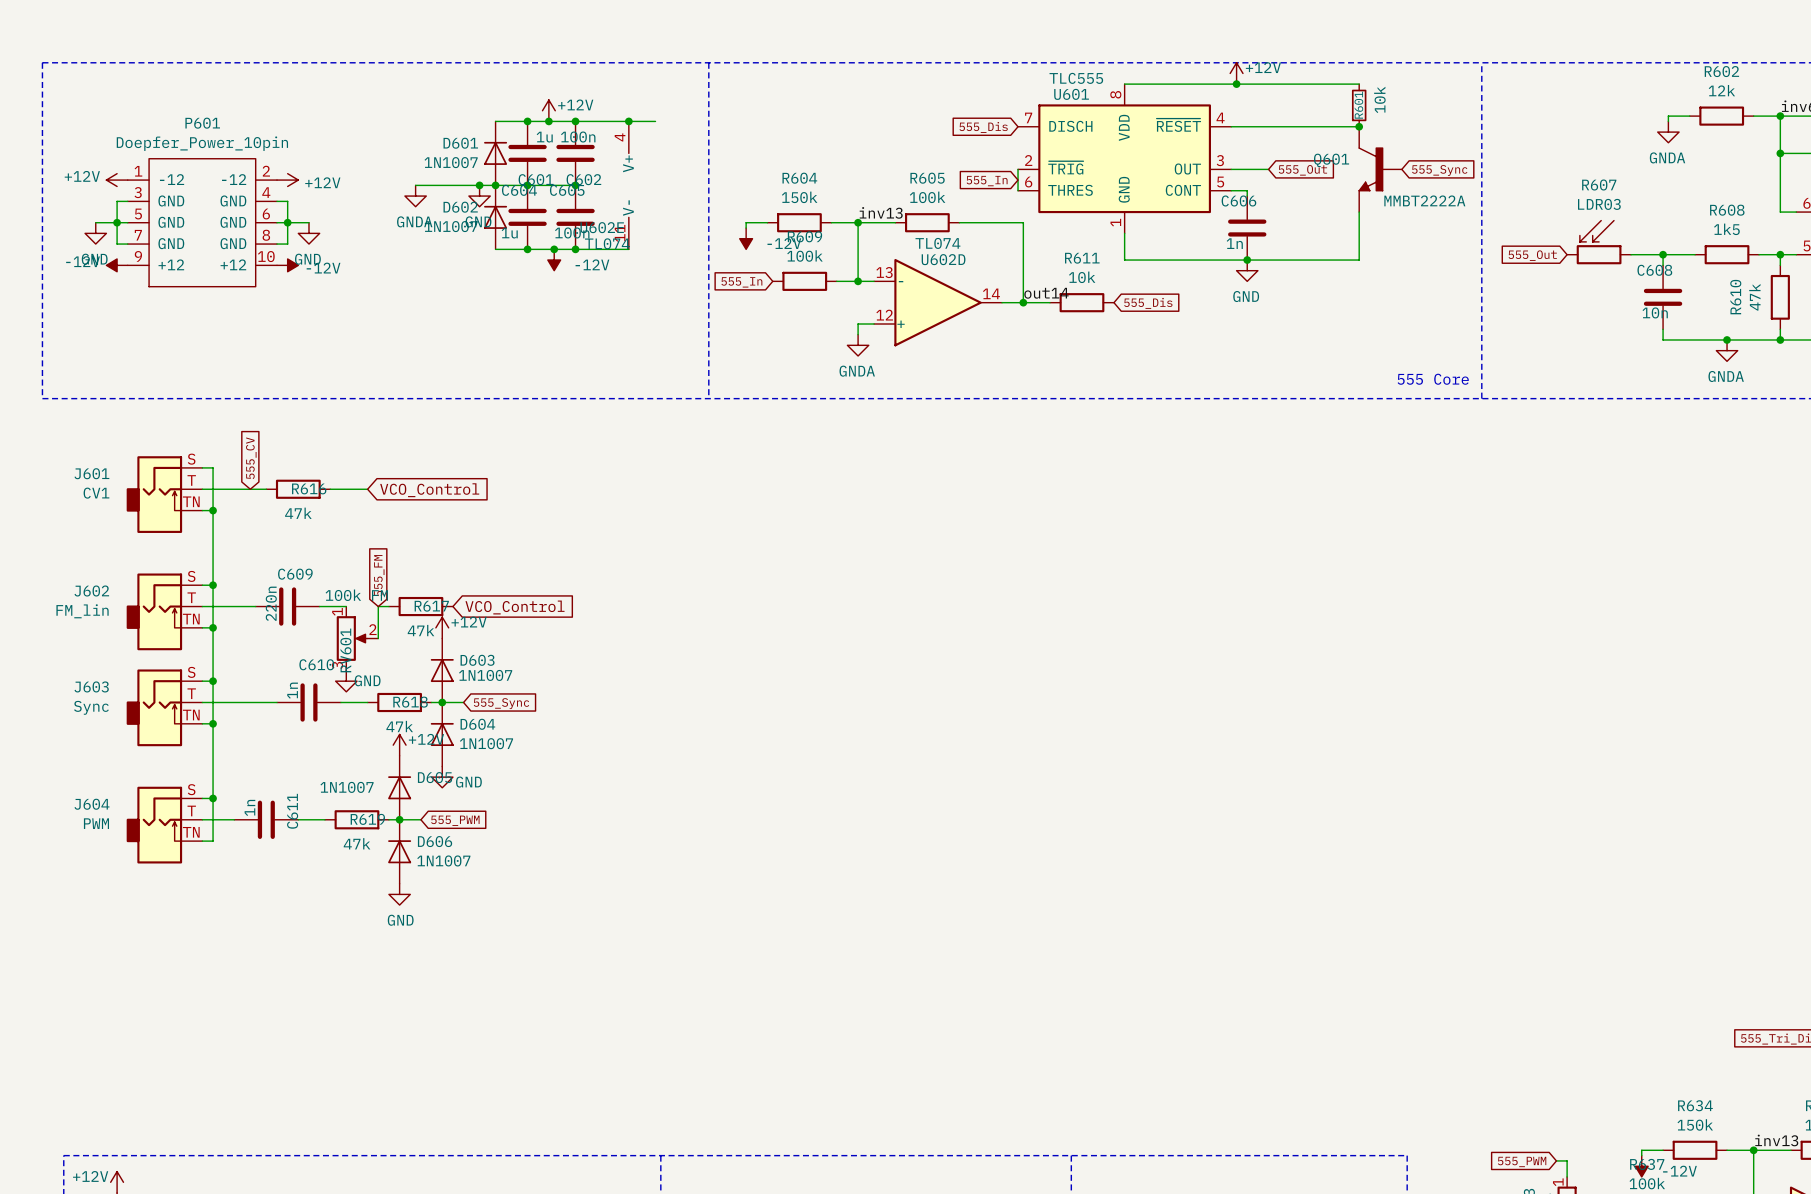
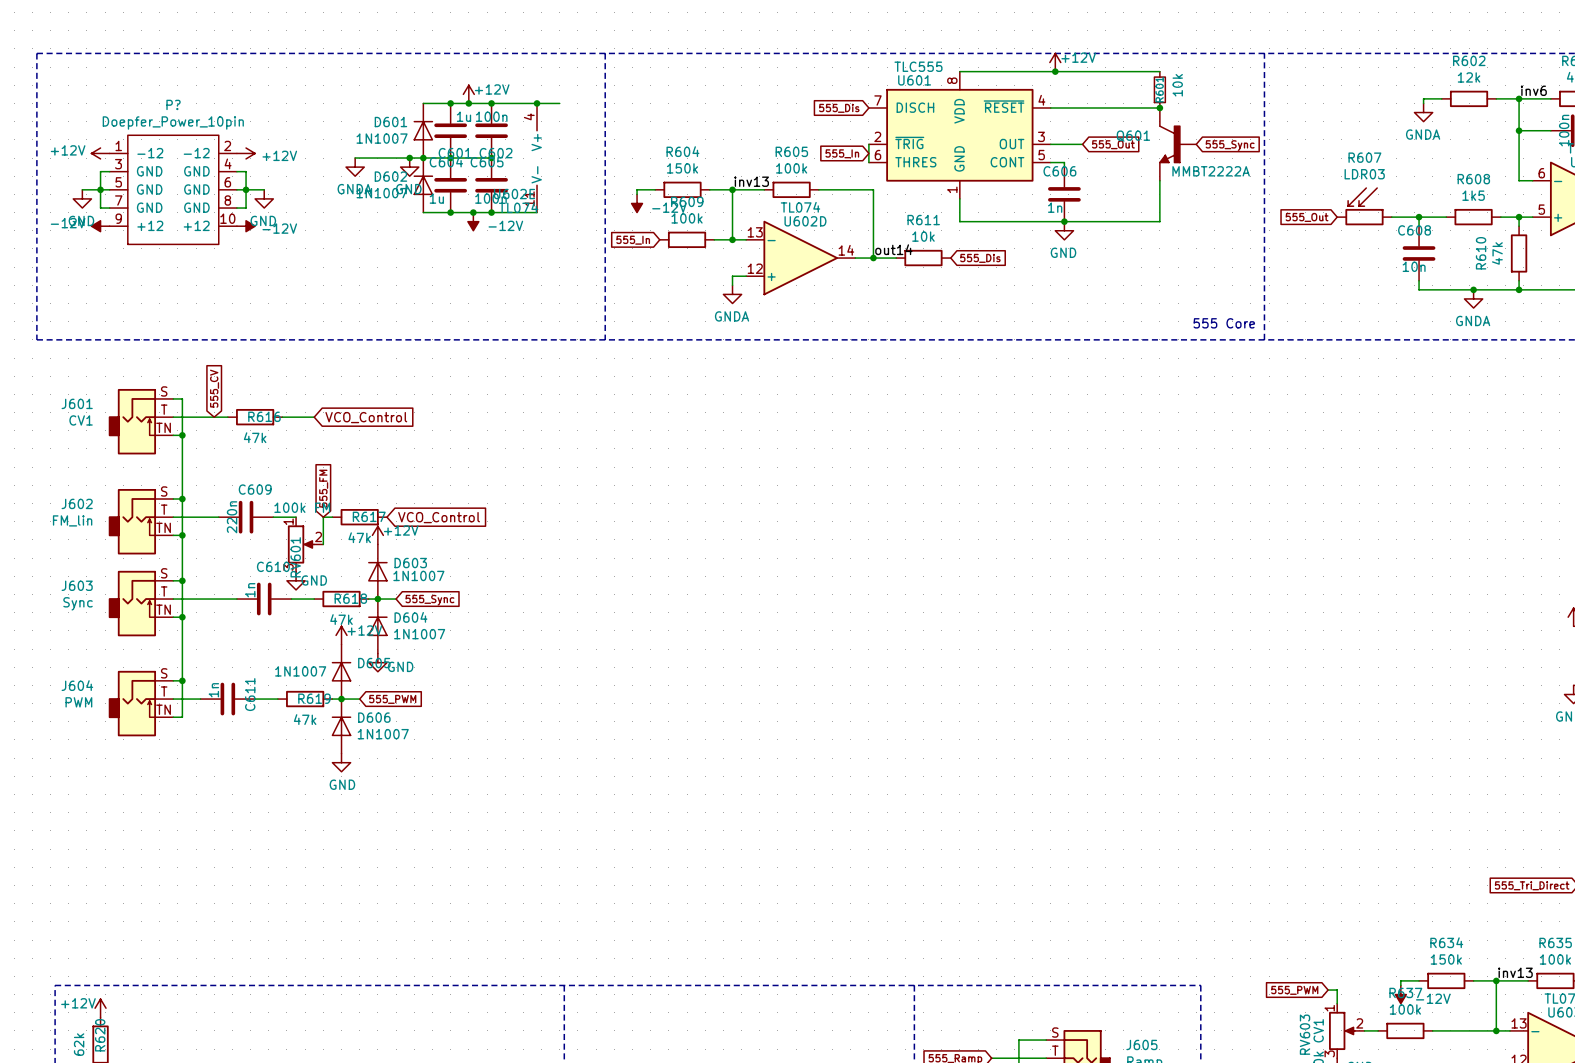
P601 name: P601 (202, 123) -> P? (173, 104)

